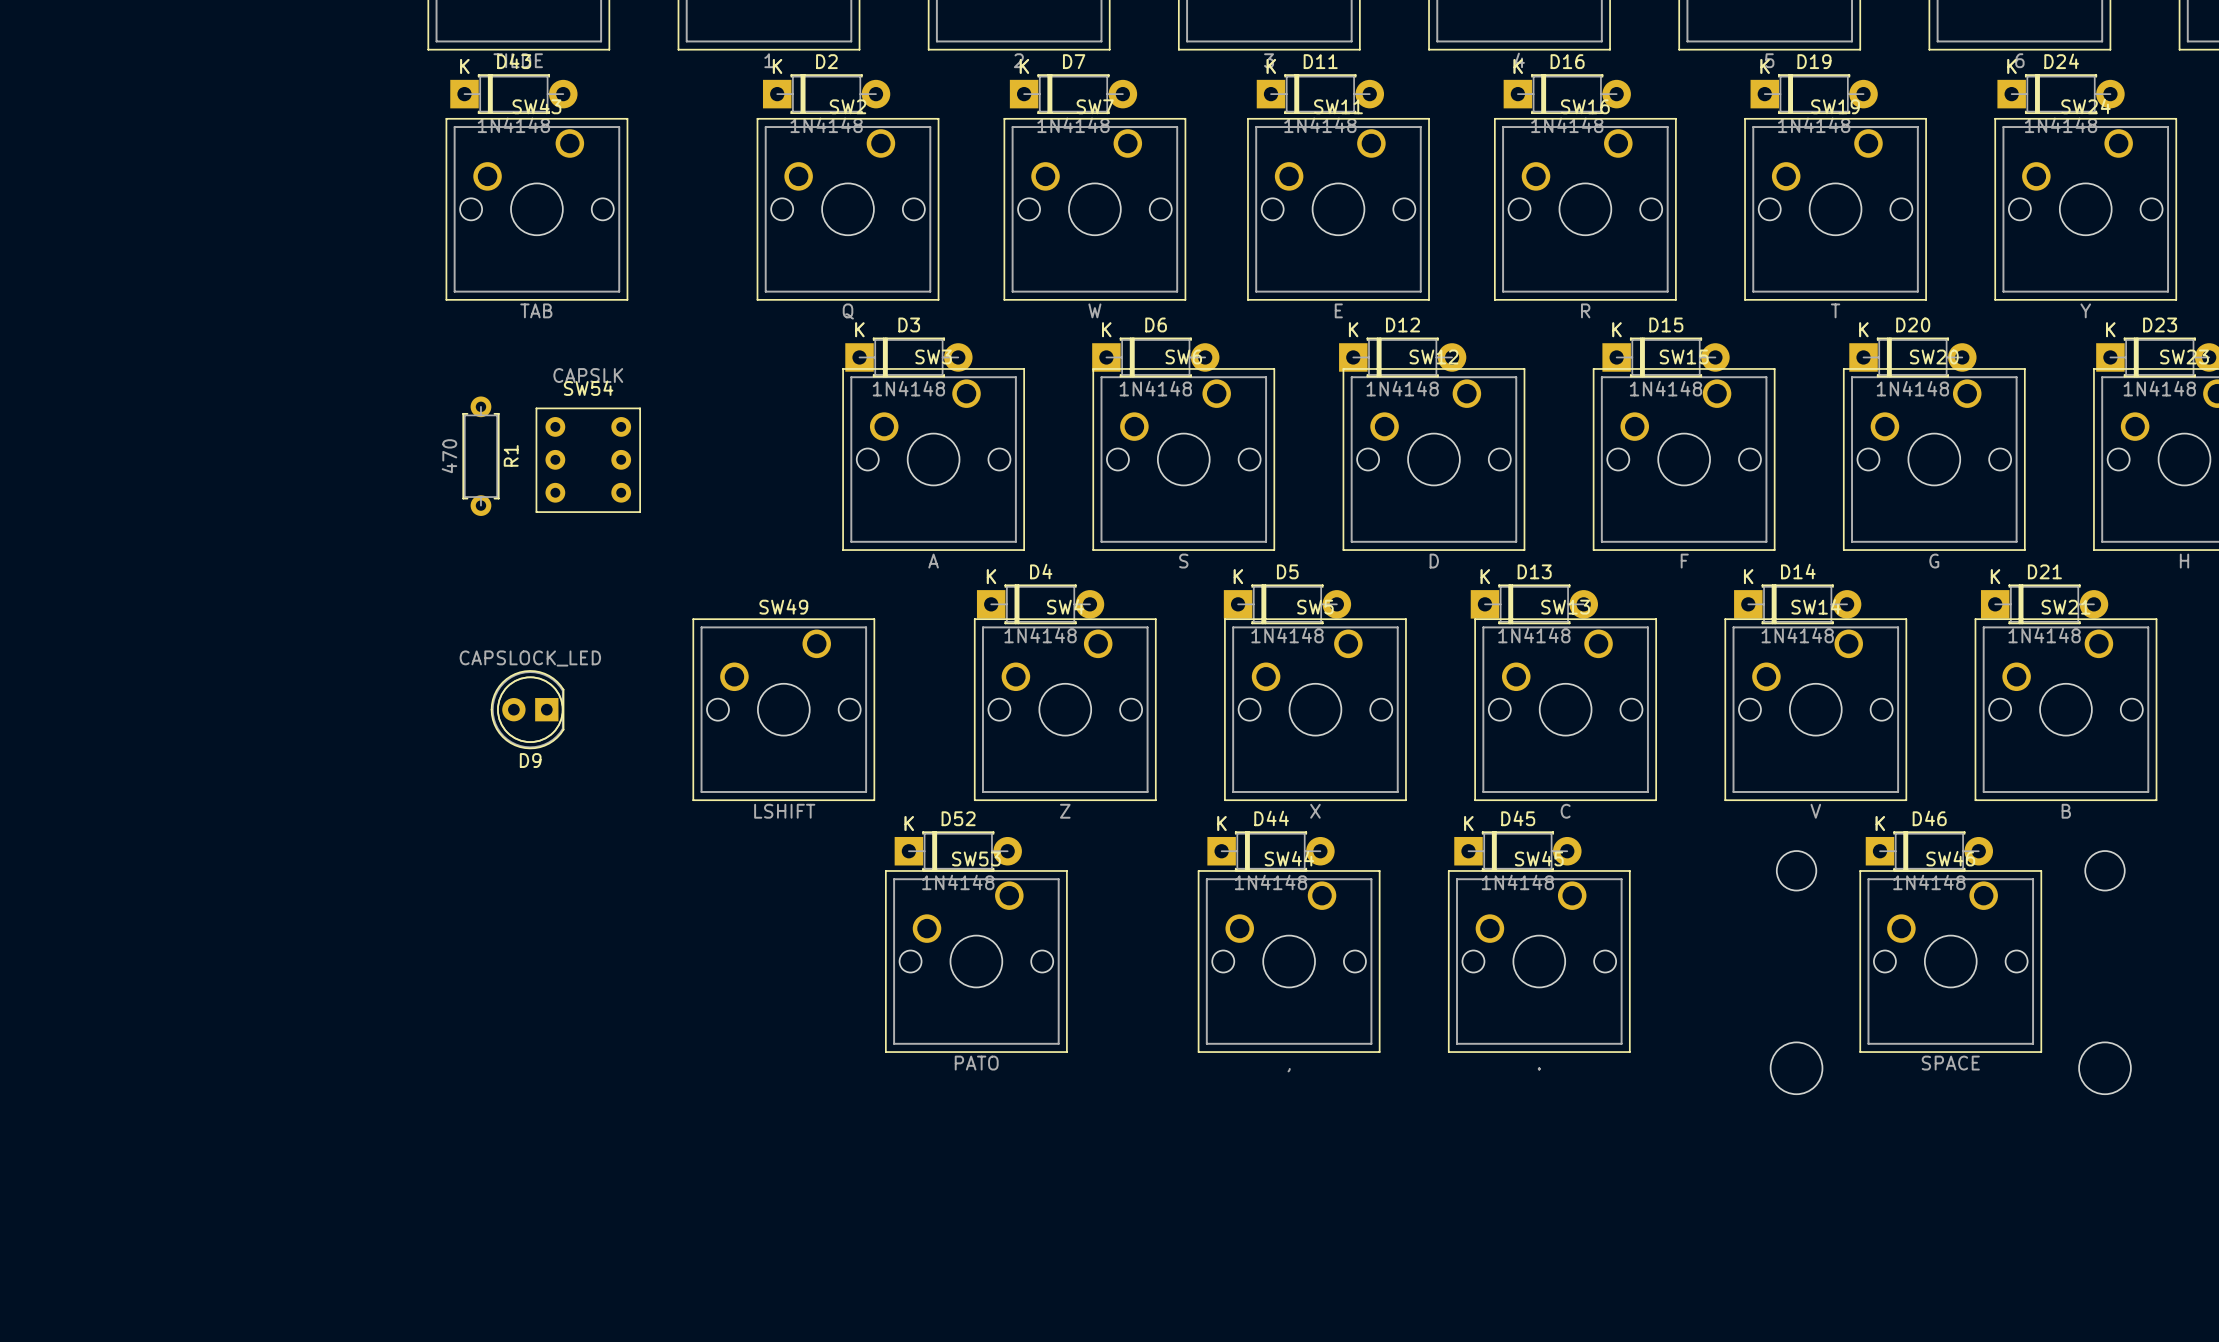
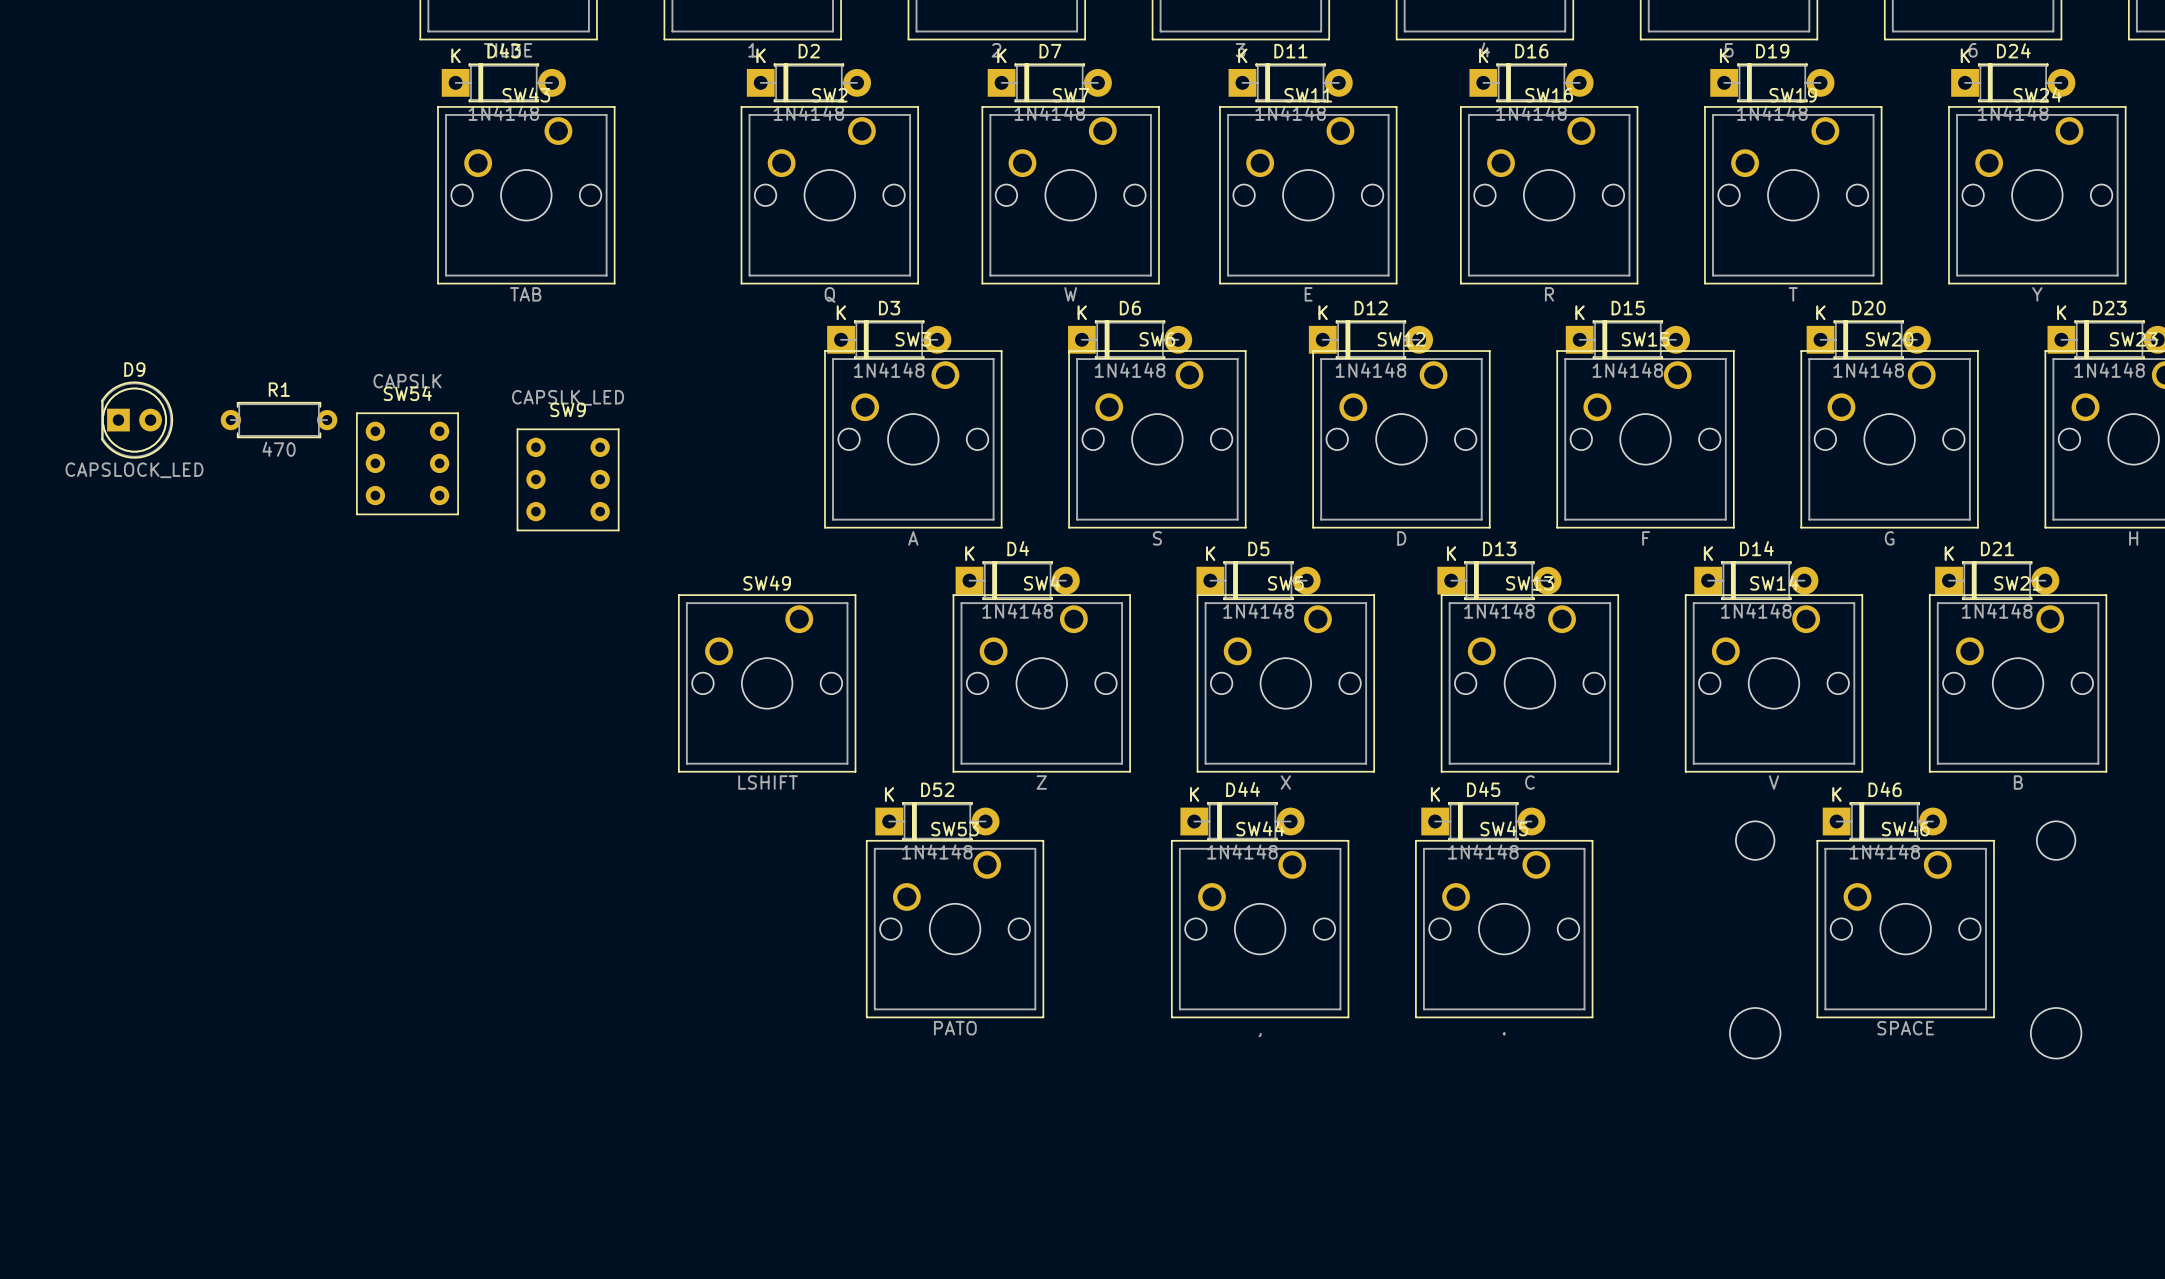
R1 name position: R1 (511, 455) -> R1 (279, 389)
R1 value position: 470 (449, 456) -> 470 (279, 449)
R1 rotation: 0° (480, 456) -> 90° clockwise (279, 420)
R1 position: (480, 456) -> (279, 420)
SW54 position: (588, 460) -> (407, 463)
SW9: none -> CAPSLK_LED (568, 479)
D9 rotation: 0° (527, 709) -> 180° (137, 420)
D9 position: (527, 709) -> (137, 420)

